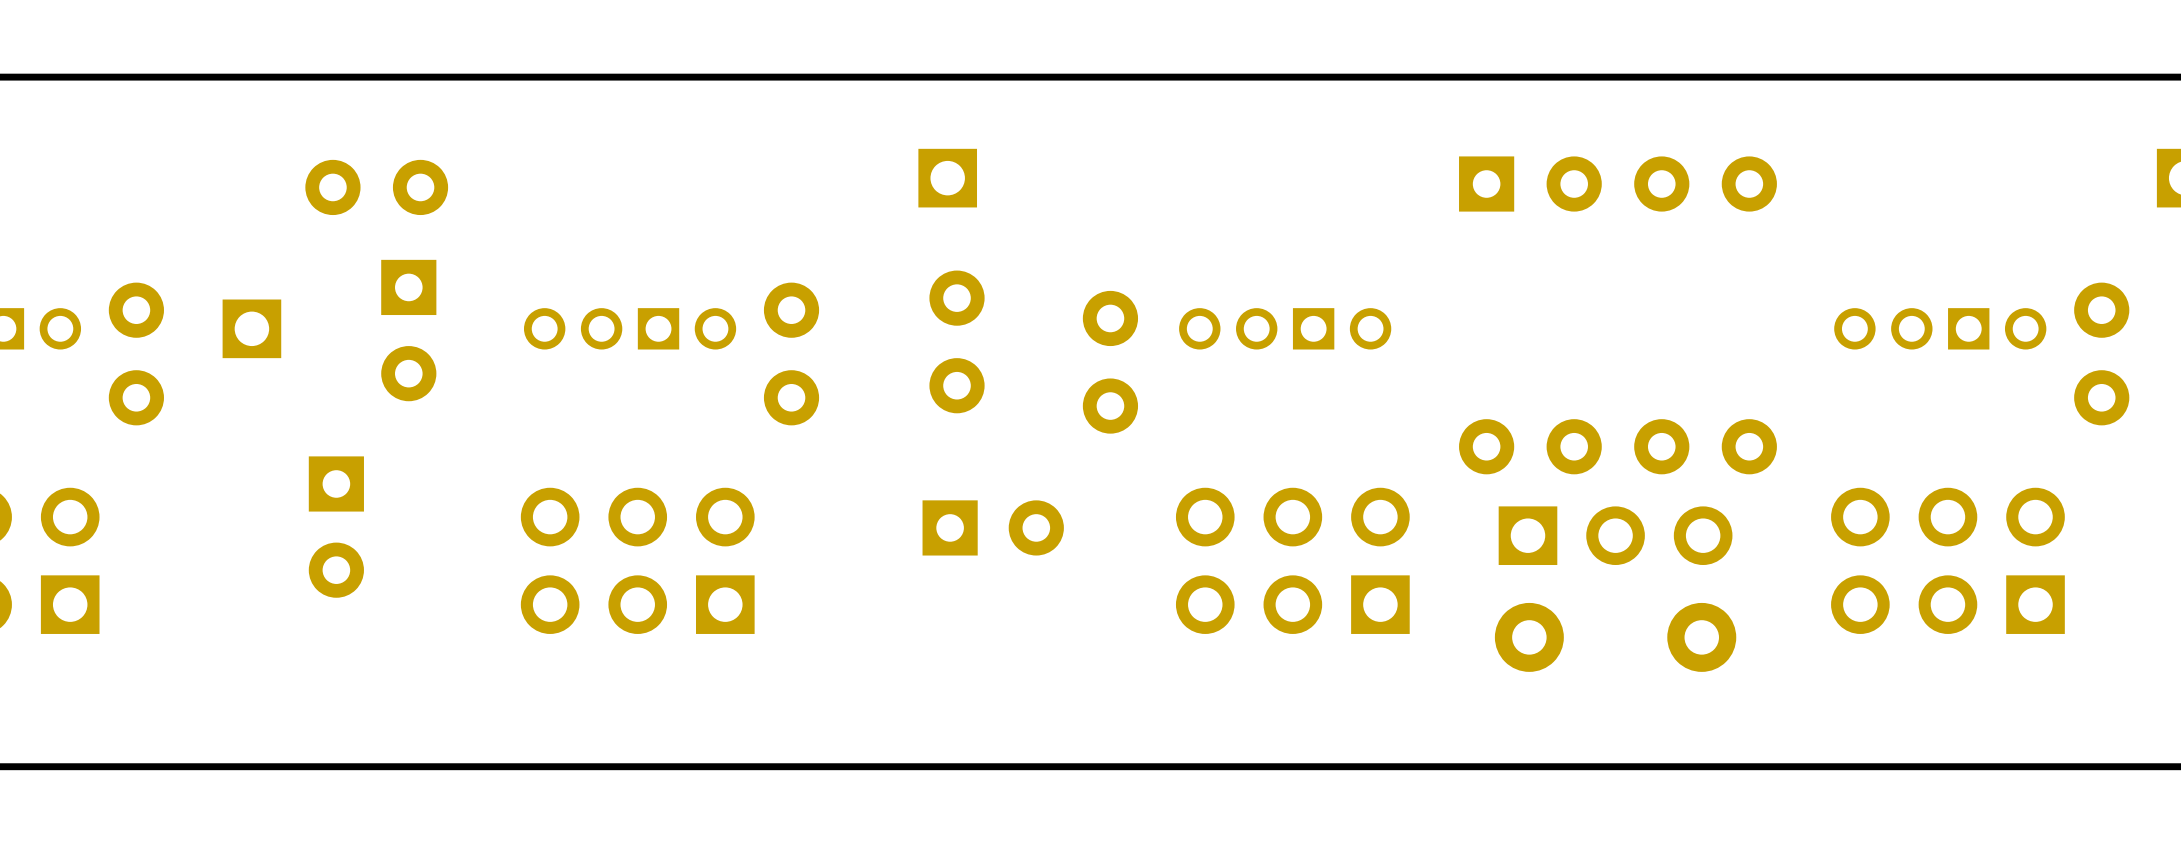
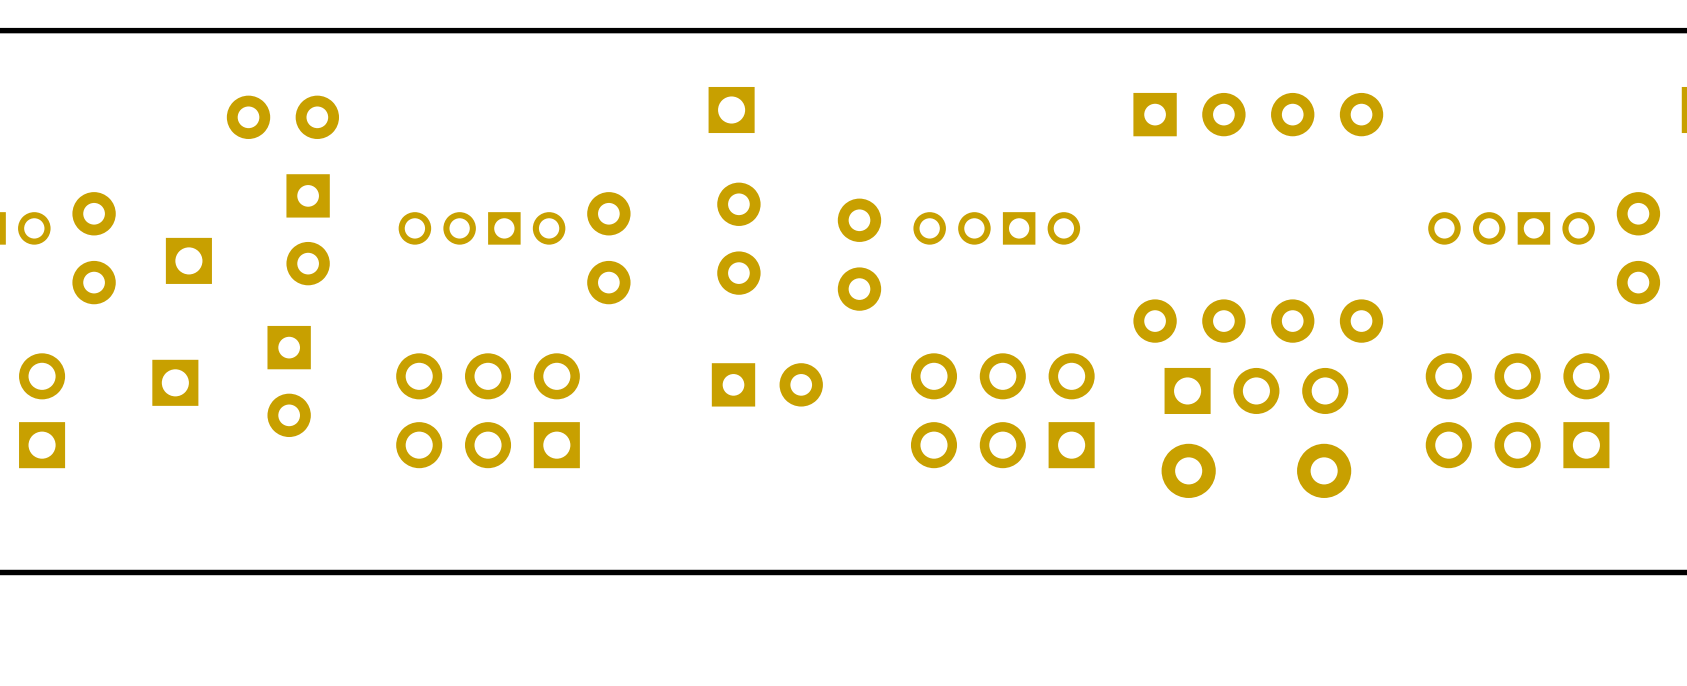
part position: (251, 328) -> (188, 260)
part: none -> (175, 382)
part position: (336, 527) -> (289, 381)

